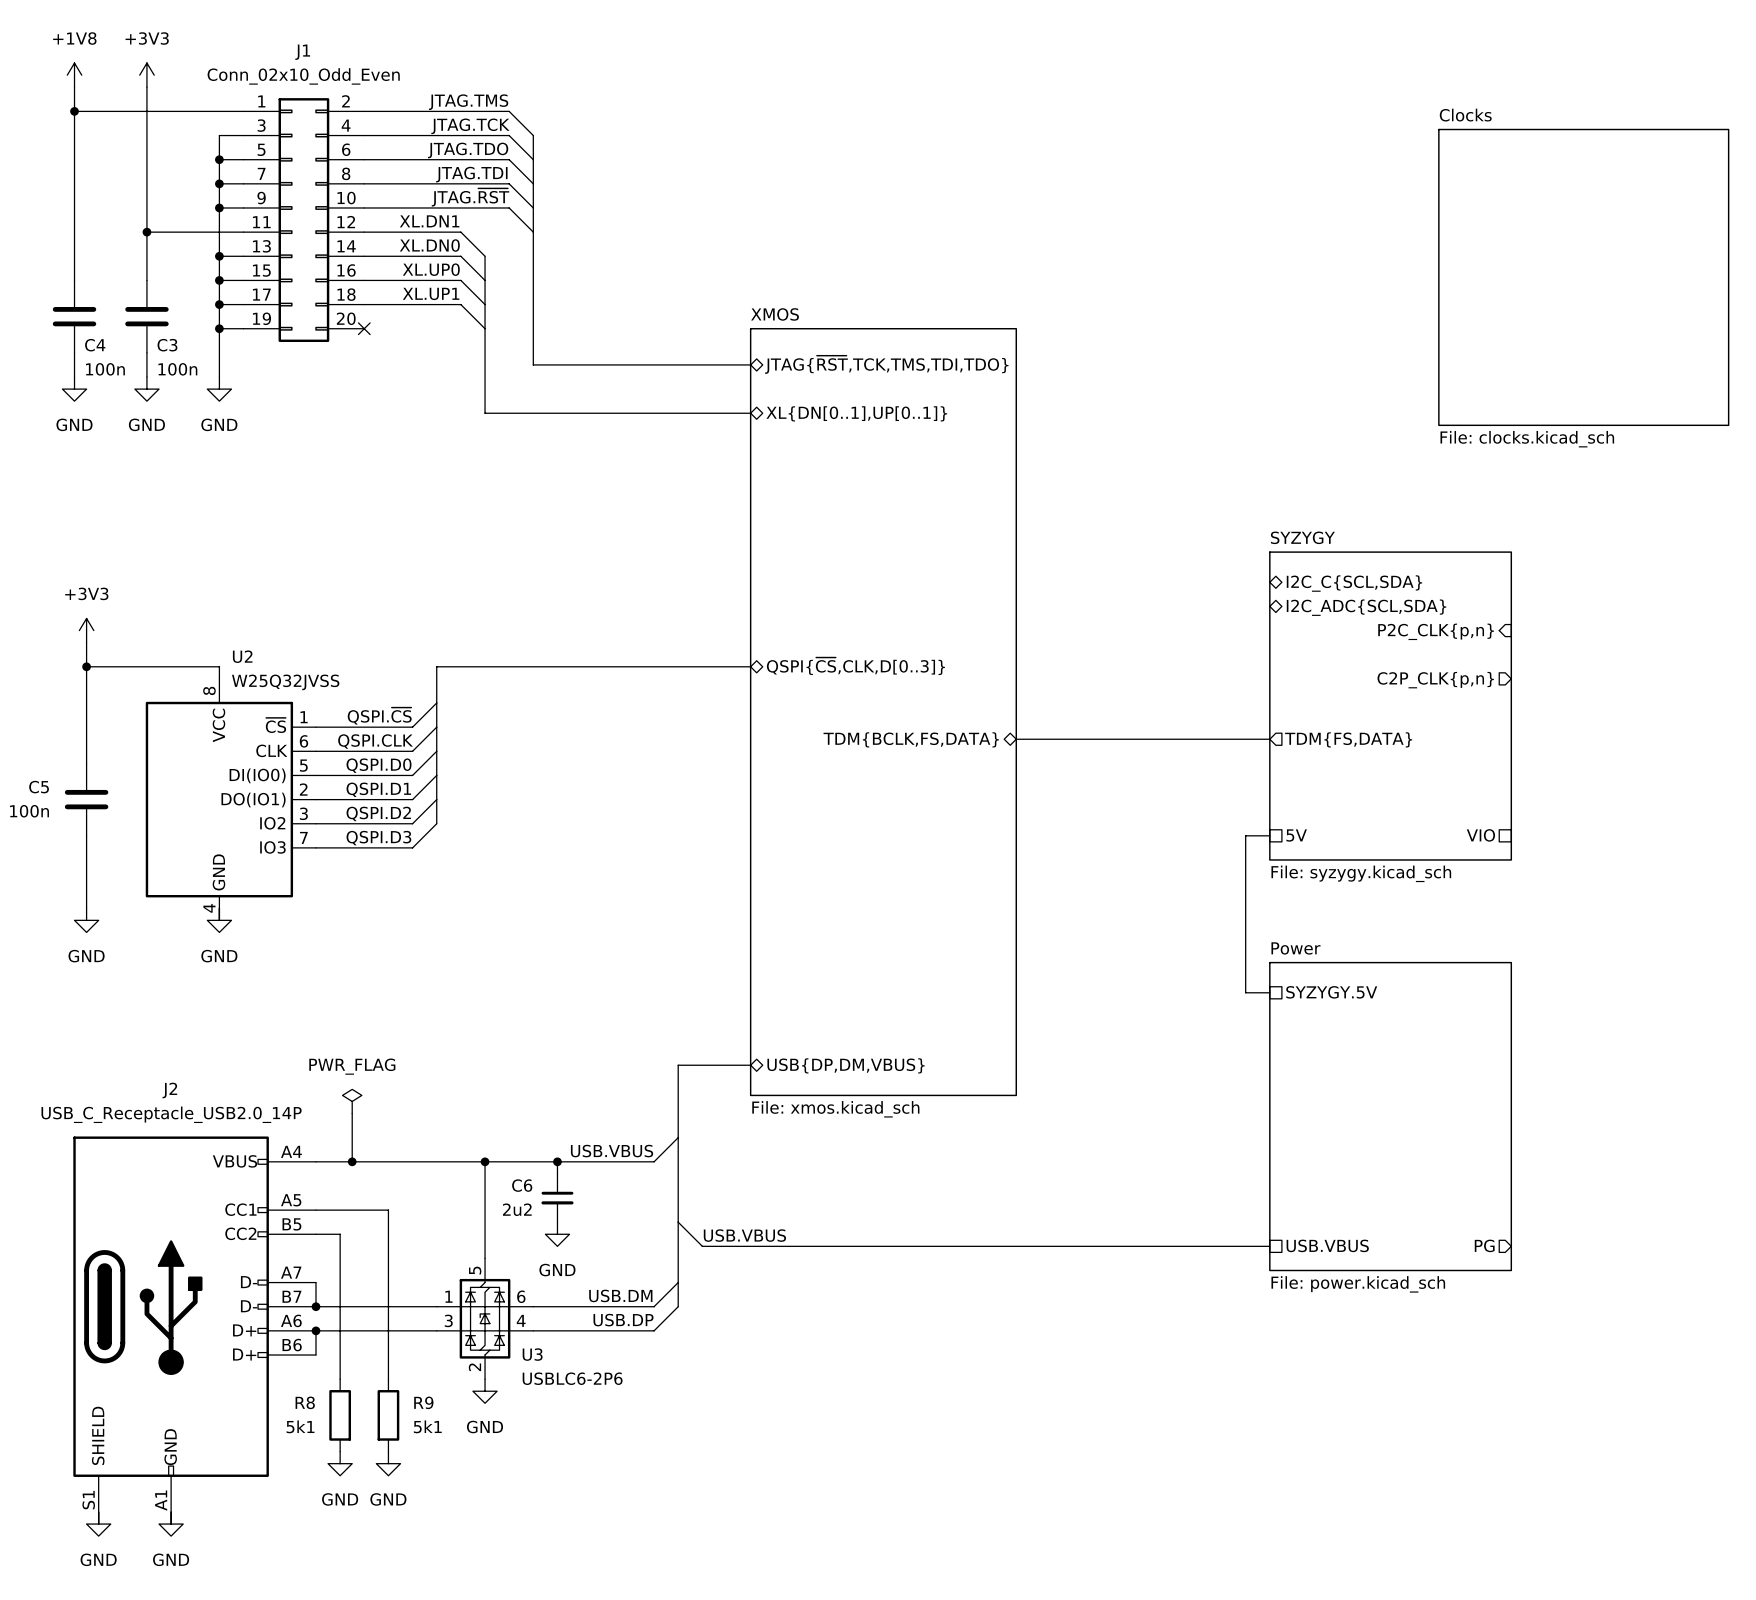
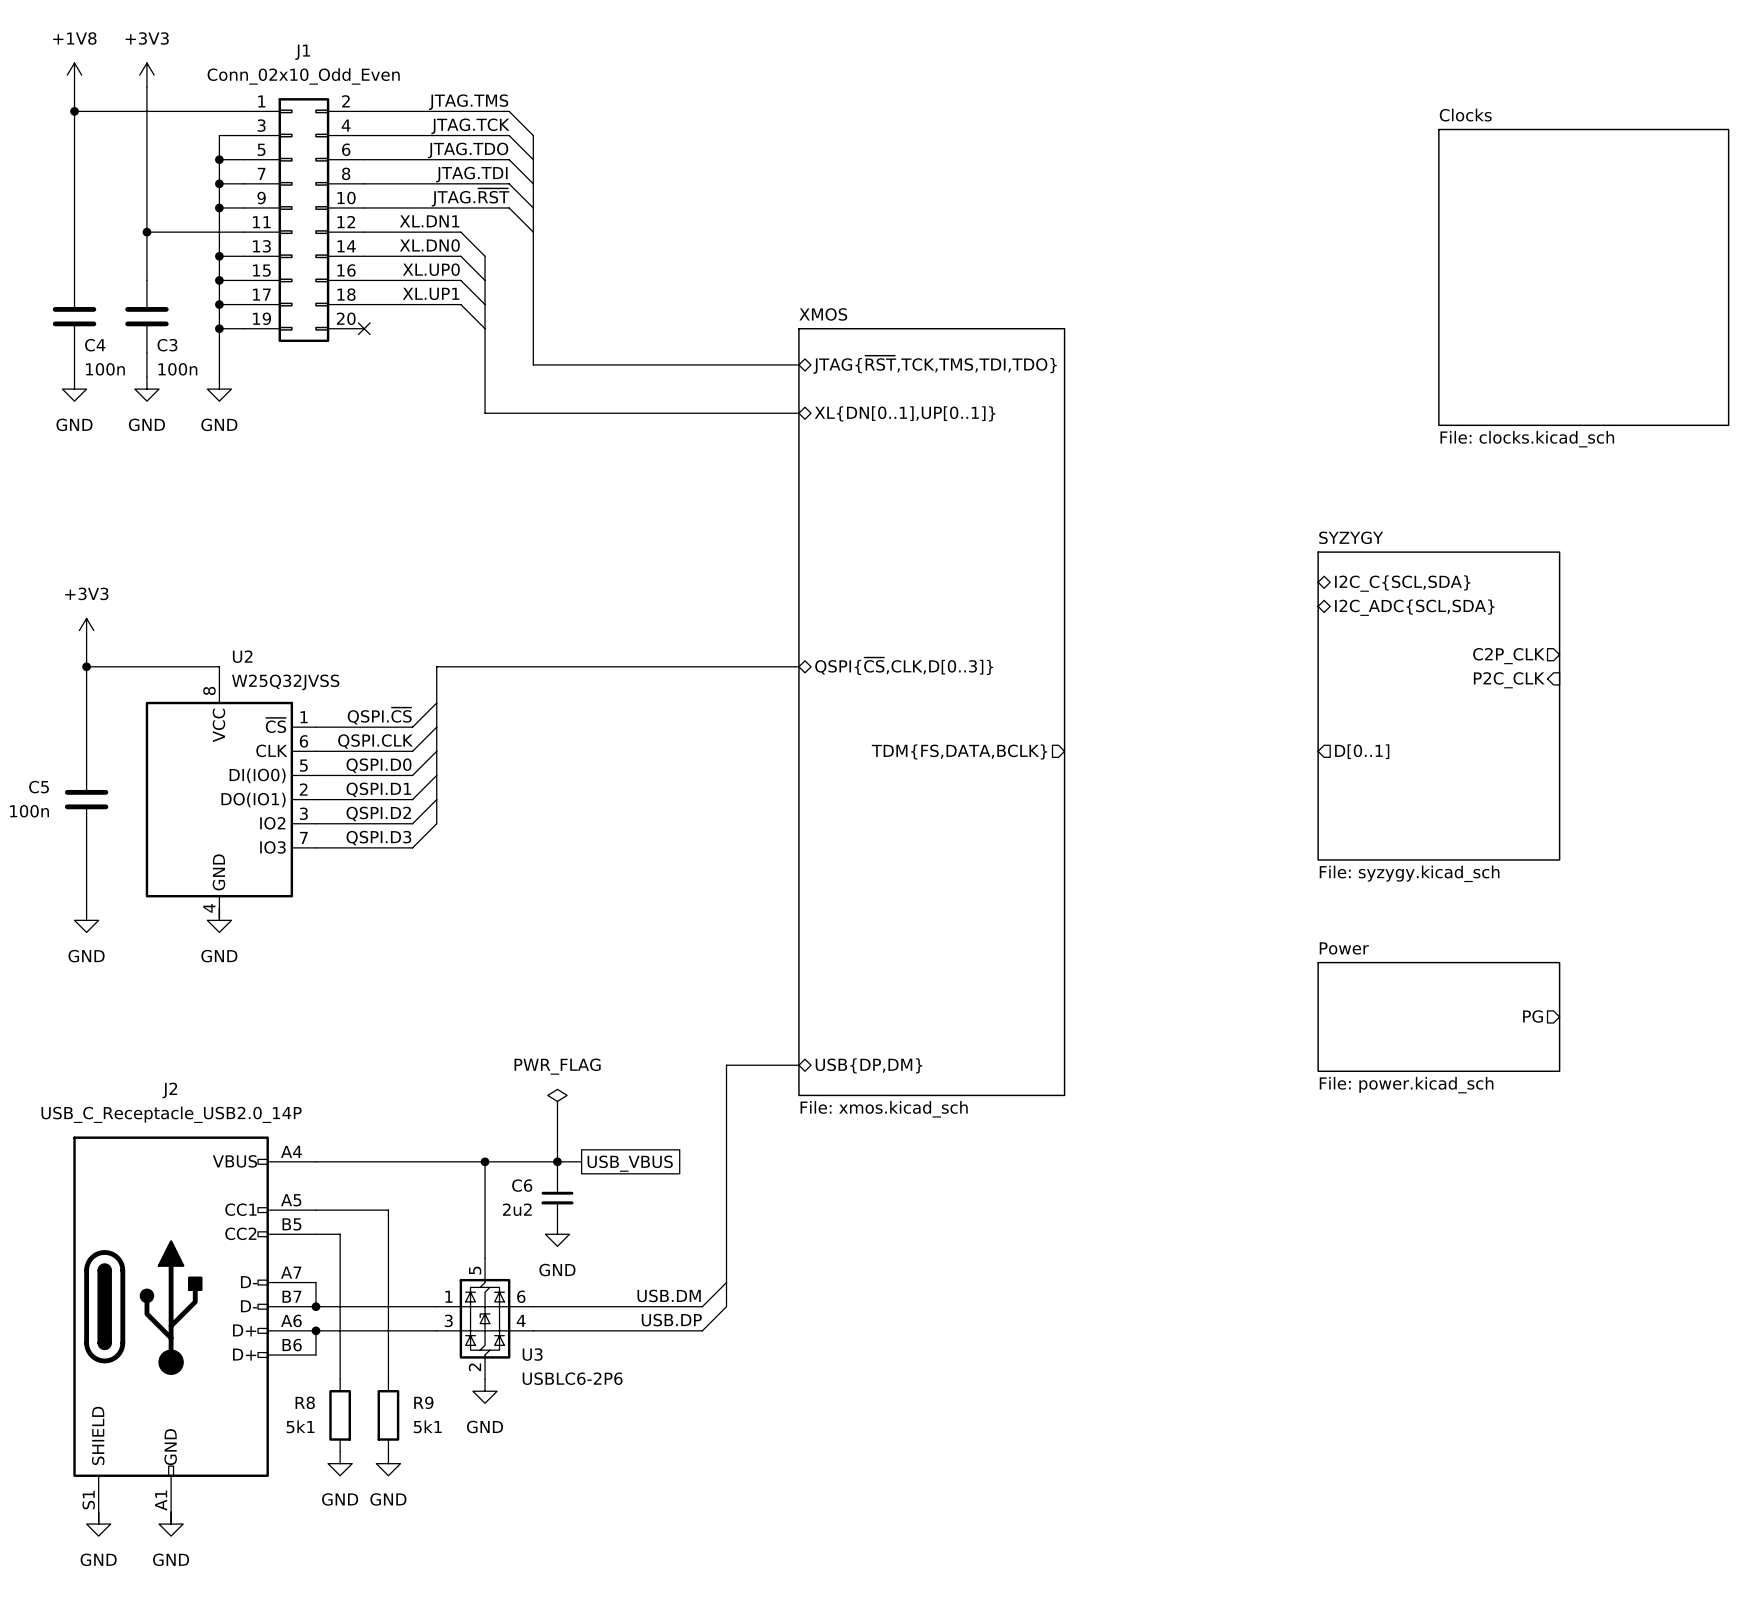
bus: none -> (750, 364) (798, 364)
sheet pin position: JTAG{~{RST},TCK,TMS,TDI,TDO} (886, 364) -> JTAG{~{RST},TCK,TMS,TDI,TDO} (935, 364)
bus: none -> (750, 413) (798, 413)
sheet pin position: XL{DN[0..1],UP[0..1]} (856, 413) -> XL{DN[0..1],UP[0..1]} (905, 413)
sheet pin position: I2C_C{SCL,SDA} (1354, 583) -> I2C_C{SCL,SDA} (1402, 583)
sheet pin position: I2C_ADC{SCL,SDA} (1366, 607) -> I2C_ADC{SCL,SDA} (1414, 607)
sheet pin: P2C_CLK{p,n} (1436, 631) -> none
bus: none -> (750, 666) (798, 666)
sheet pin position: QSPI{~{CS},CLK,D[0..3]} (855, 666) -> QSPI{~{CS},CLK,D[0..3]} (904, 666)
sheet pin: C2P_CLK{p,n} (1435, 680) -> C2P_CLK (1508, 656)
sheet pin: none -> P2C_CLK (1509, 680)
sheet SYZYGY position: (1390, 706) -> (1438, 706)
sheet XMOS position: (883, 712) -> (931, 712)
sheet pin shape: bidirectional (911, 739) -> output (959, 751)
sheet pin: TDM{BCLK,FS,DATA} (911, 739) -> TDM{FS,DATA,BCLK} (959, 751)
bus: (1016, 739) (1269, 739) -> none
sheet pin: TDM{FS,DATA} (1348, 739) -> none
sheet pin: none -> D[0..1] (1362, 751)
wire: (1269, 835) (1245, 835) (1245, 992) (1269, 992) -> none
sheet pin: 5V (1296, 835) -> none
sheet pin: VIO (1480, 835) -> none
sheet pin: SYZYGY.5V (1331, 992) -> none
sheet Power: none -> File: power.kicad_sch (1438, 1016)
bus: (726, 1065) (678, 1065) (678, 1306) -> (726, 1065) (726, 1306)
bus: none -> (750, 1065) (798, 1065)
sheet pin: USB{DP,DM,VBUS} (846, 1065) -> USB{DP,DM} (869, 1065)
power symbol position: PWR_FLAG (352, 1101) -> PWR_FLAG (557, 1101)
wire: (352, 1113) (352, 1161) -> (557, 1113) (557, 1161)
sheet Power: File: power.kicad_sch (1390, 1116) -> none
wire: (678, 1137) (654, 1161) (581, 1161) -> none
label: USB.VBUS (612, 1151) -> none
junction: (352, 1161) -> none
global label: none -> USB_VBUS (630, 1163)
wire: (678, 1222) (702, 1246) (1269, 1246) -> none
label: USB.VBUS (744, 1235) -> none
sheet pin: USB.VBUS (1327, 1245) -> none
sheet pin position: PG (1484, 1245) -> PG (1532, 1016)
wire: (678, 1282) (654, 1306) -> (726, 1282) (702, 1306) (654, 1306)
label position: USB.DM (620, 1295) -> USB.DM (669, 1295)
wire: (678, 1306) (654, 1330) -> (726, 1306) (702, 1330) (654, 1330)
label position: USB.DP (623, 1320) -> USB.DP (671, 1320)

